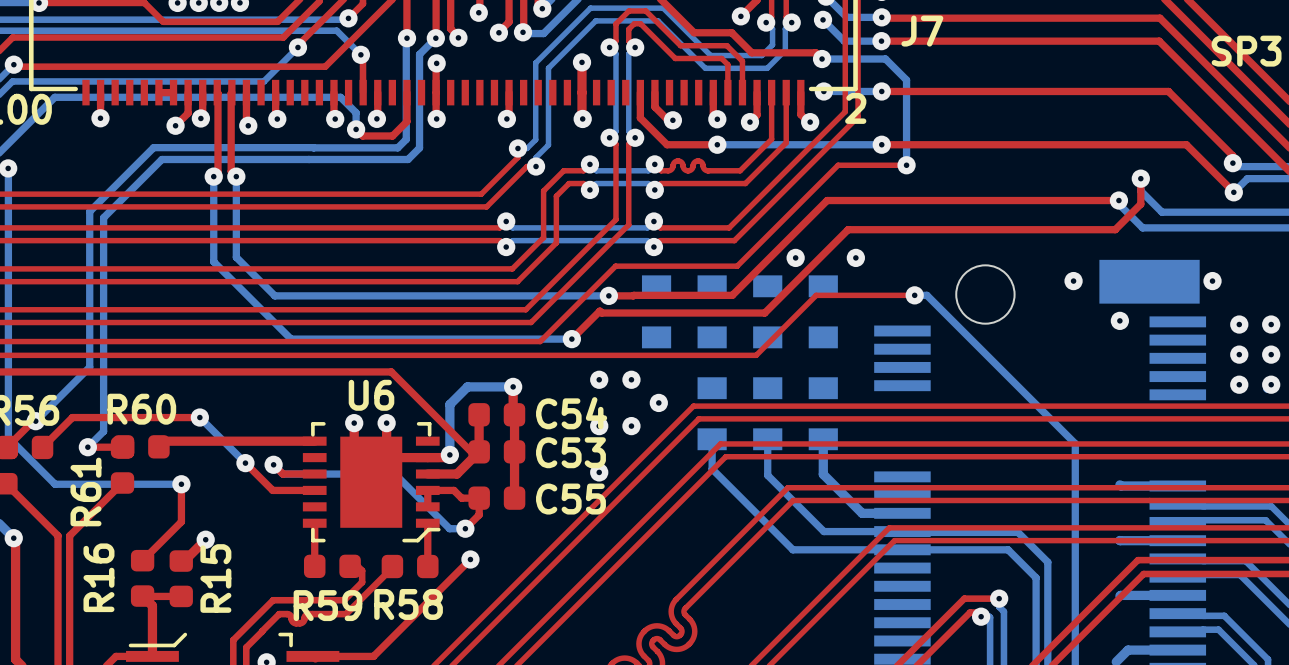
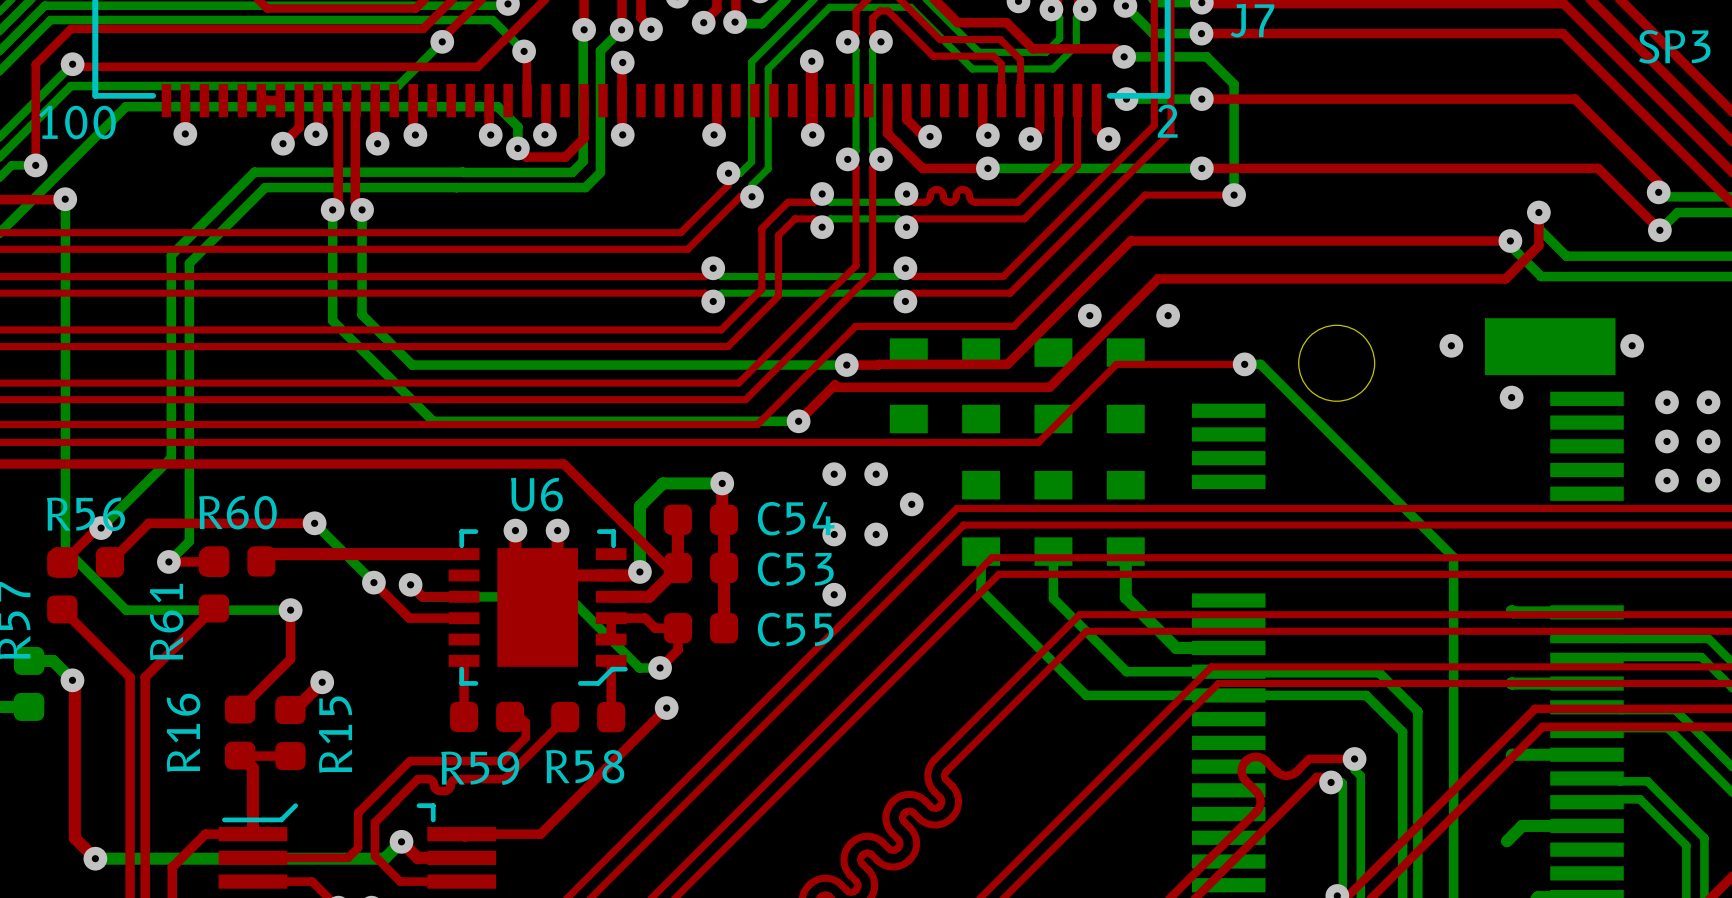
top track: (954, 608) (923, 639) -> (1296, 771) (1288, 775) (1281, 774) (1259, 757) (1252, 757) (1245, 761) (1242, 767) (1242, 775) (1260, 798) (1259, 806) (1256, 811)

